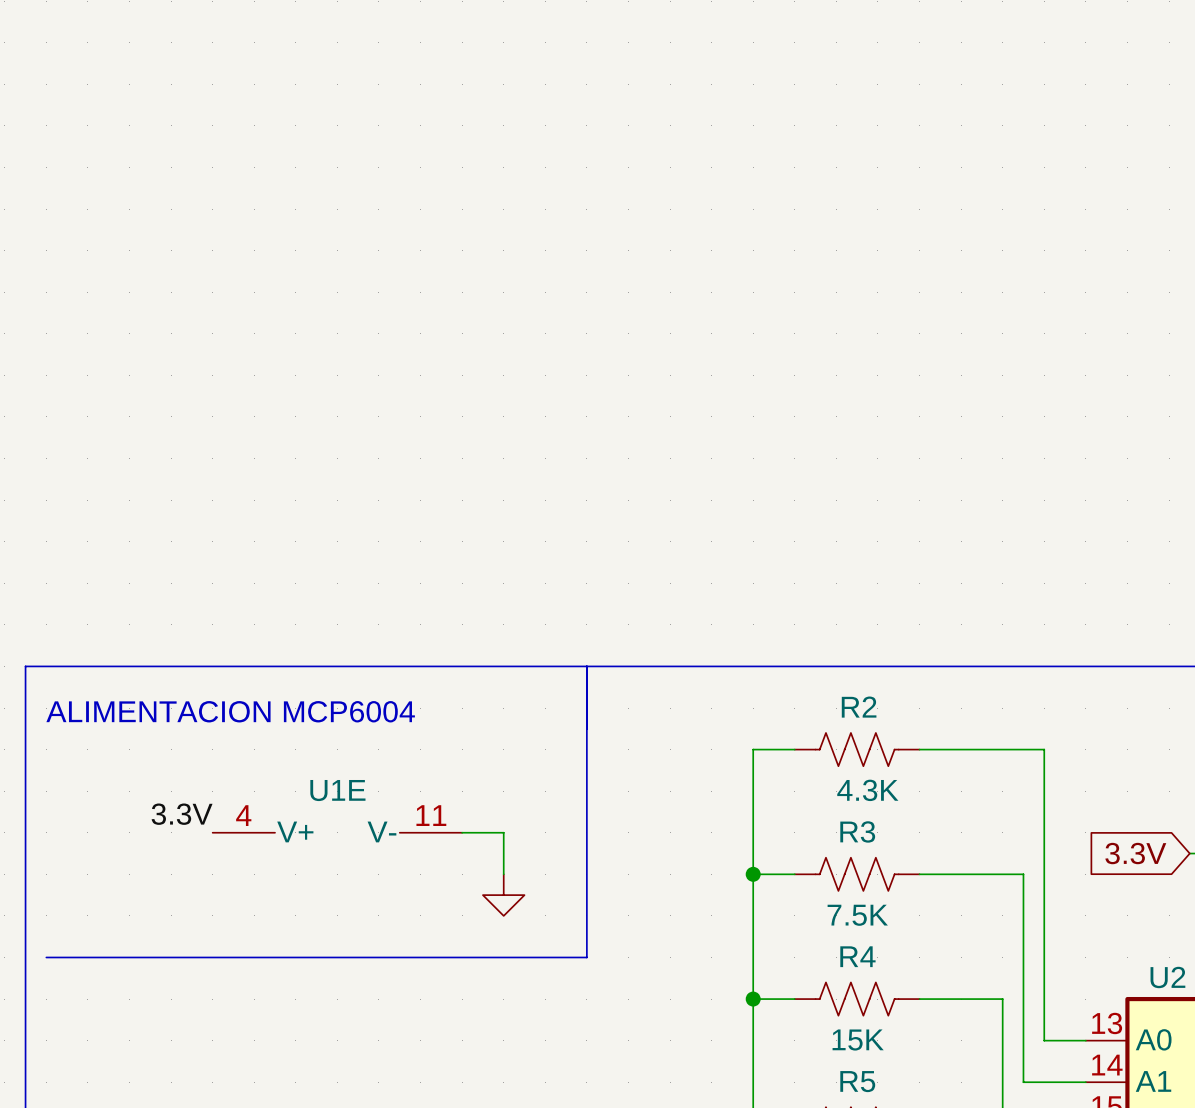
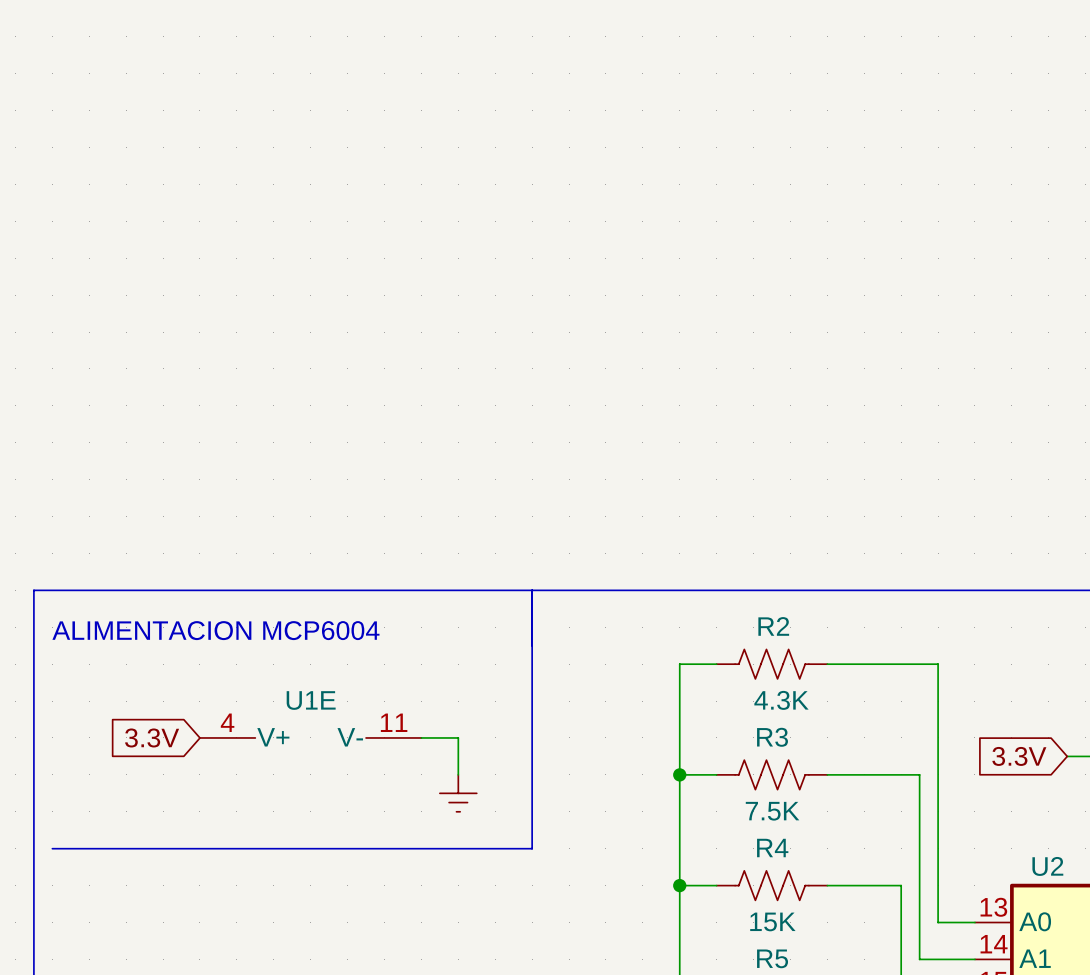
label: 3.3V (182, 814) -> none
global label: none -> 3.3V (152, 737)
power symbol shape: [482, 874, 525, 916] -> [439, 774, 477, 812]

